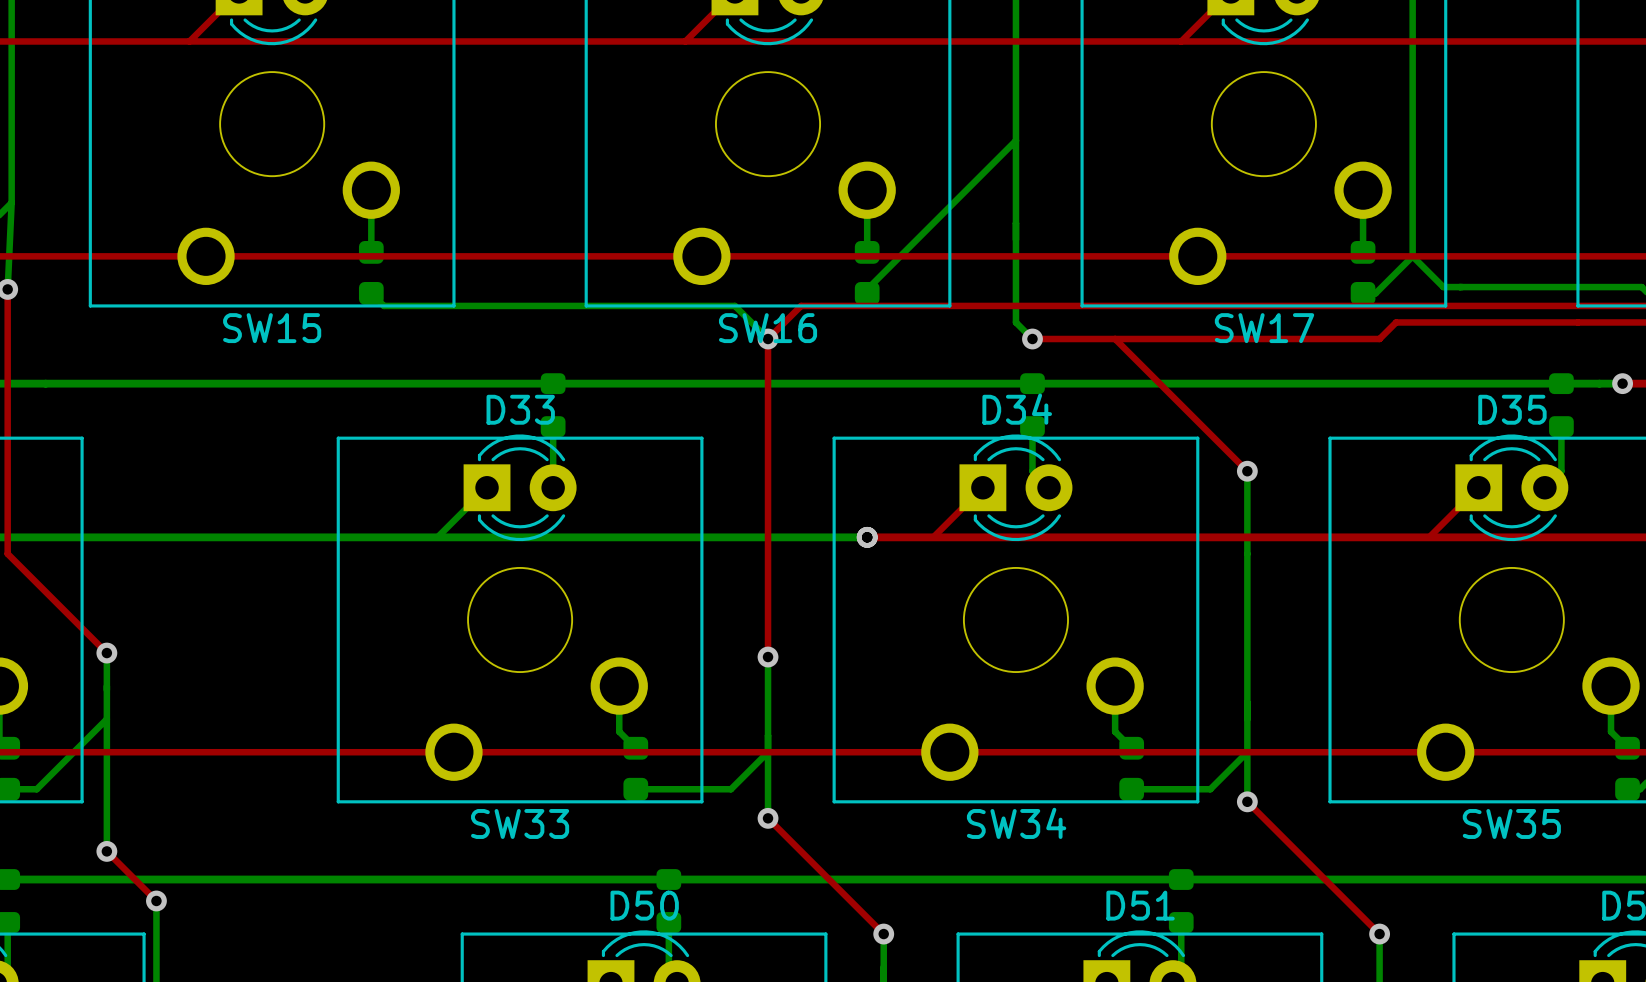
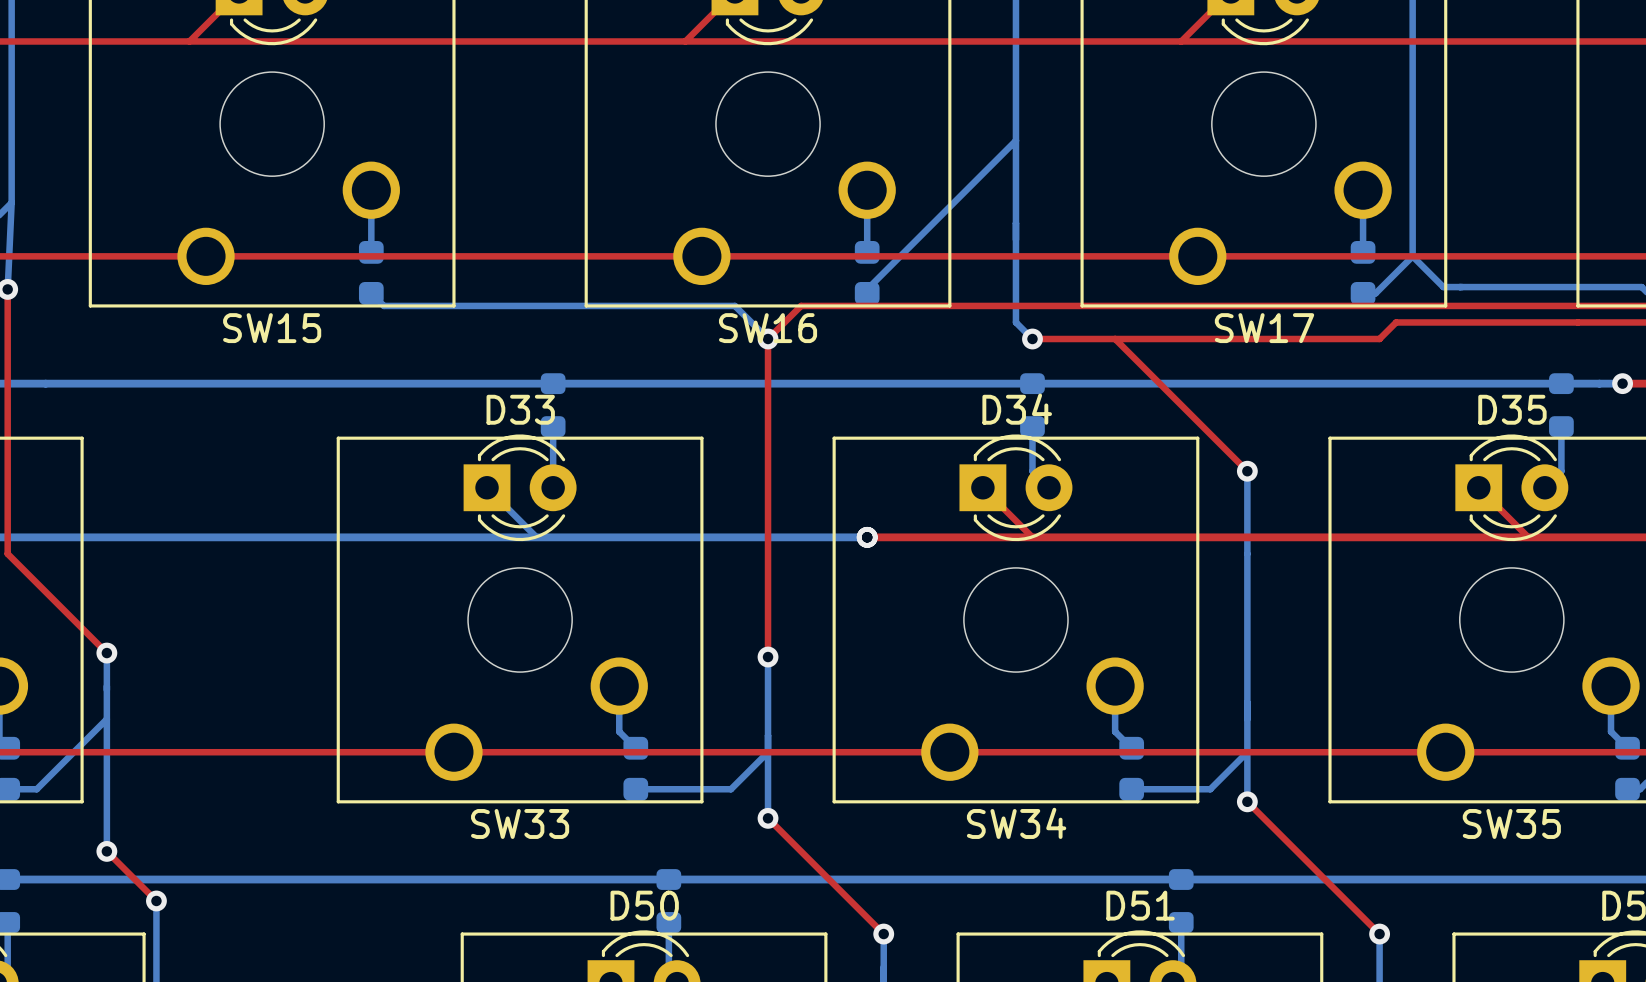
bottom track: (487, 487) (437, 537) -> (487, 487) (536, 537)
top track: (982, 487) (933, 537) -> (982, 487) (1032, 537)
top track: (1478, 487) (1429, 537) -> (1478, 487) (1528, 537)

